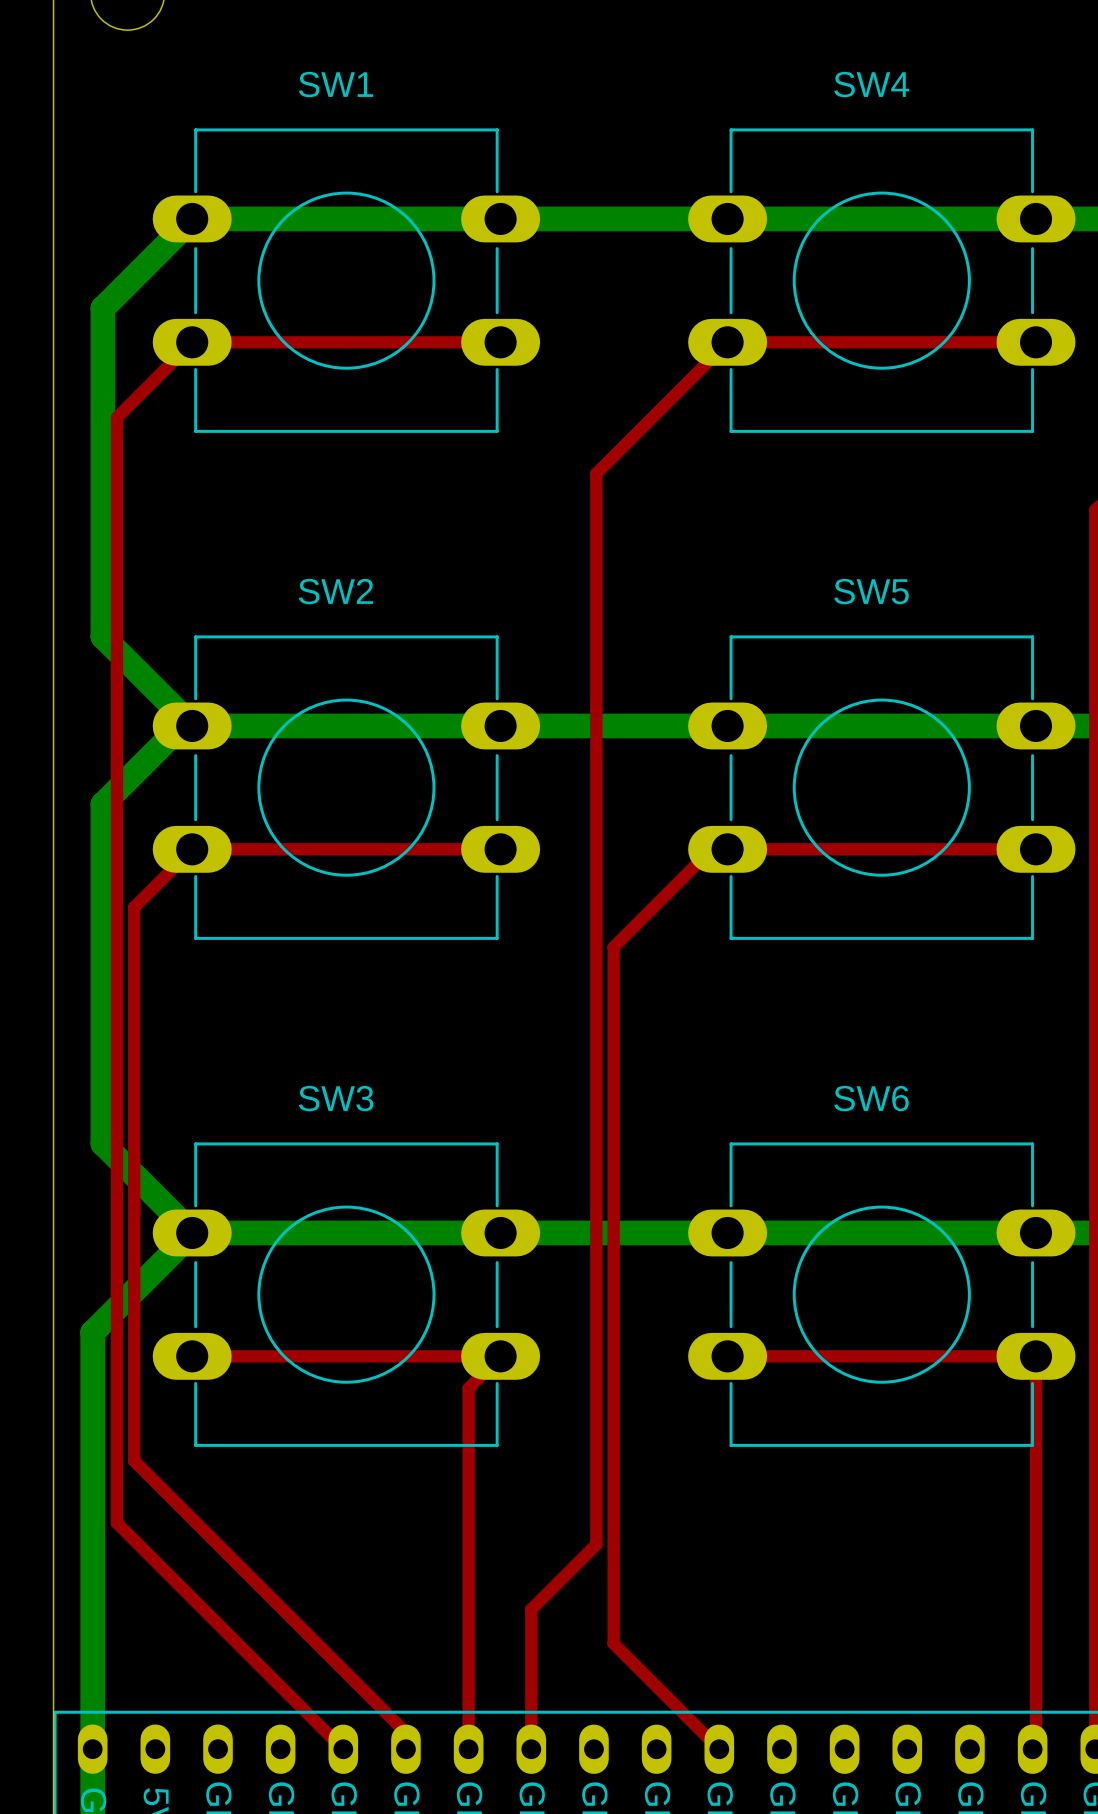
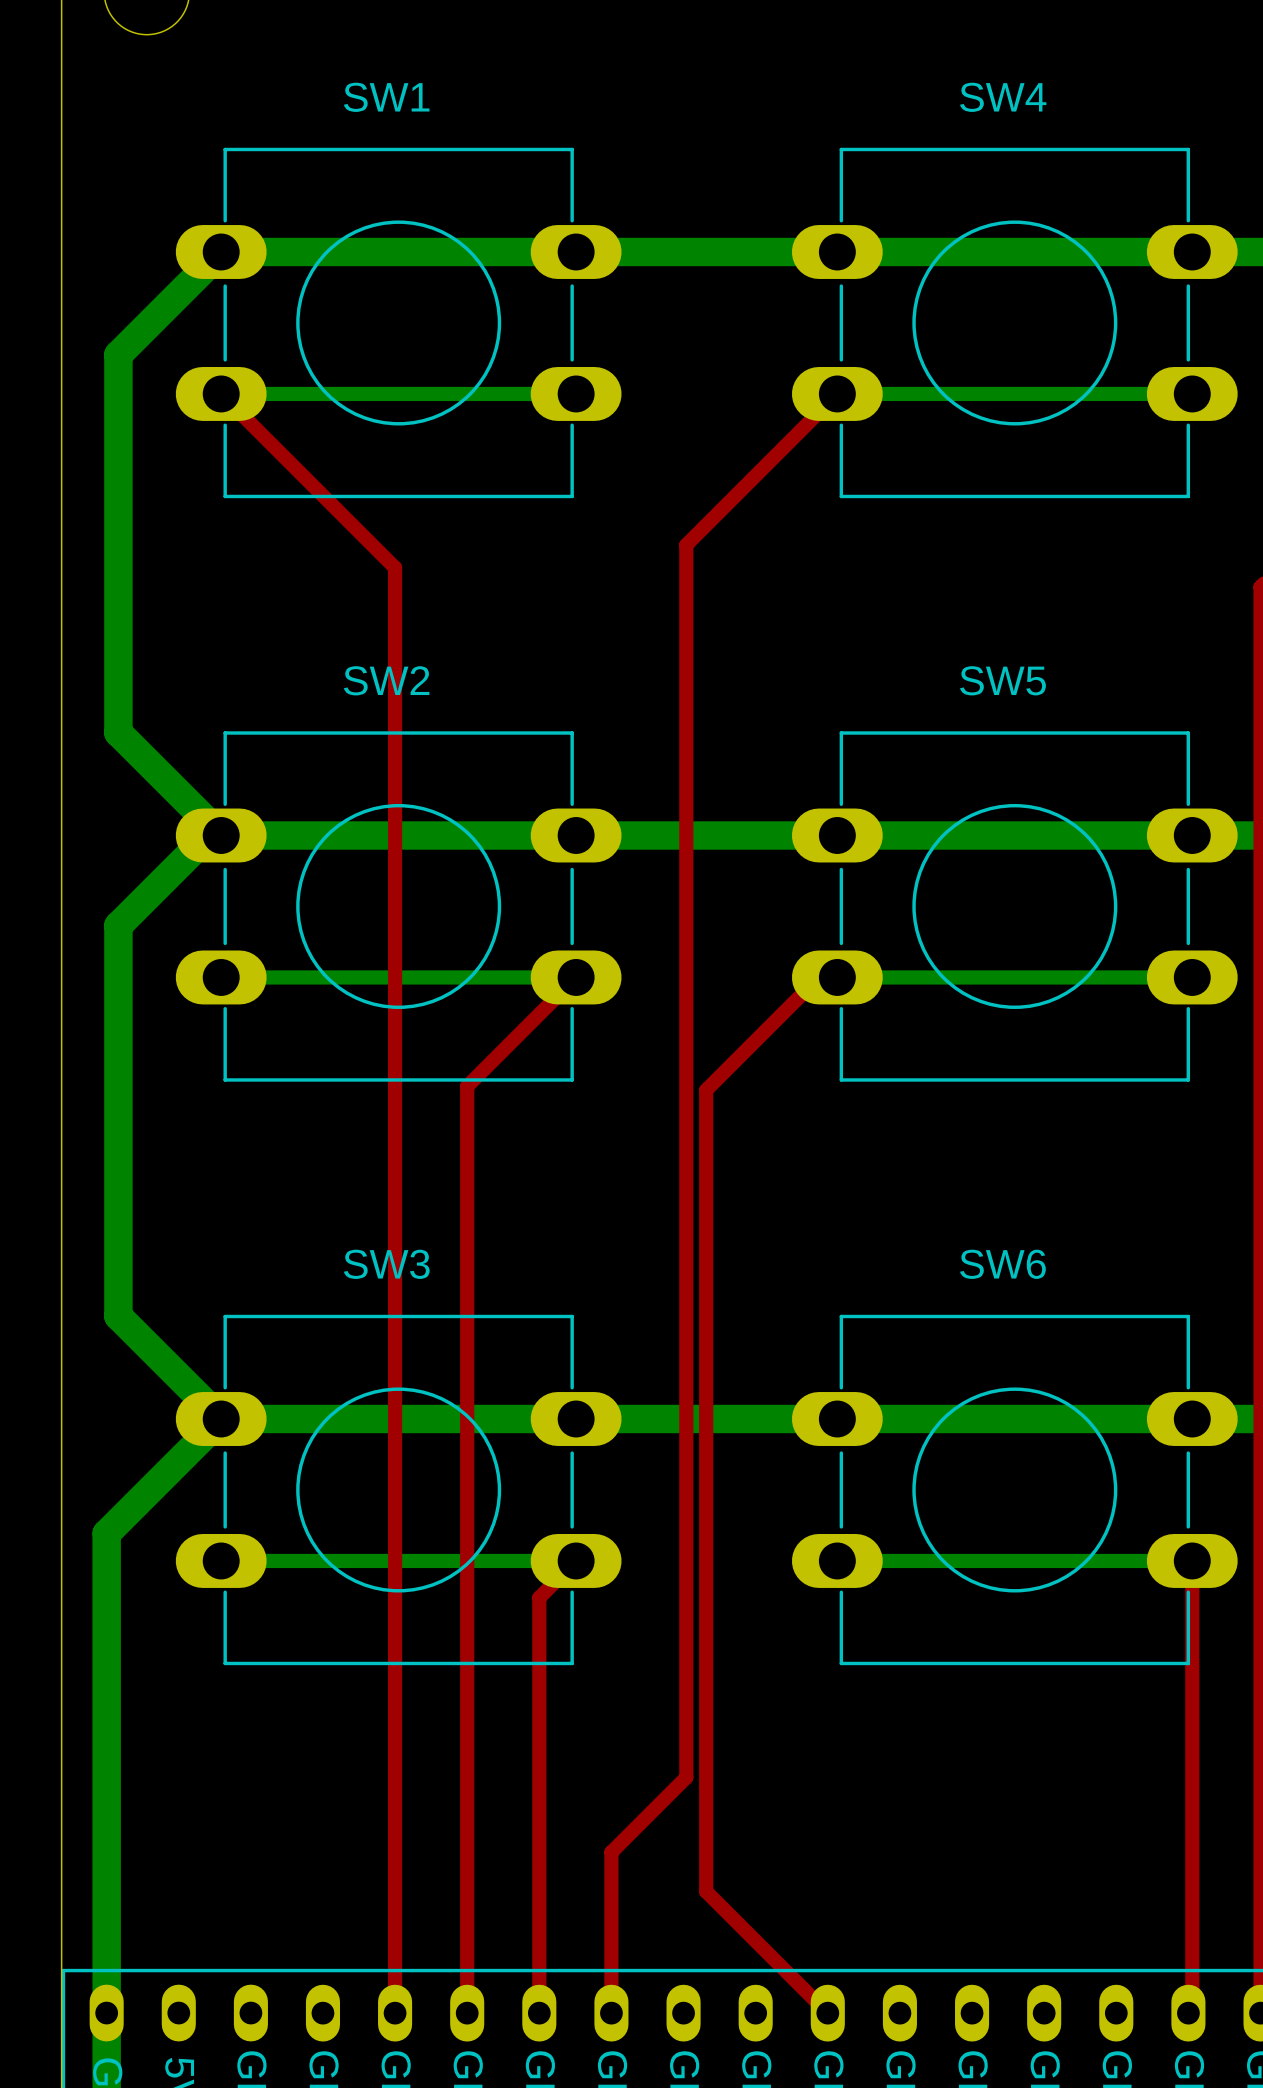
bottom track: none -> (221, 393) (576, 393)
top track: (500, 342) (192, 342) (116, 417) (116, 1522) (343, 1749) -> (221, 393) (395, 567) (395, 2013)
bottom track: none -> (837, 393) (1192, 393)
top track: (727, 342) (1036, 342) -> none
bottom track: none -> (221, 977) (576, 977)
top track: (500, 849) (192, 849) (134, 907) (134, 1461) (405, 1732) -> (576, 977) (467, 1086) (467, 1994)
bottom track: none -> (837, 977) (1192, 977)
top track: (727, 849) (1036, 849) -> none
bottom track: none -> (221, 1560) (576, 1560)
top track: (192, 1356) (500, 1356) -> none
bottom track: none -> (837, 1560) (1192, 1560)
top track: (727, 1356) (1036, 1356) -> none

